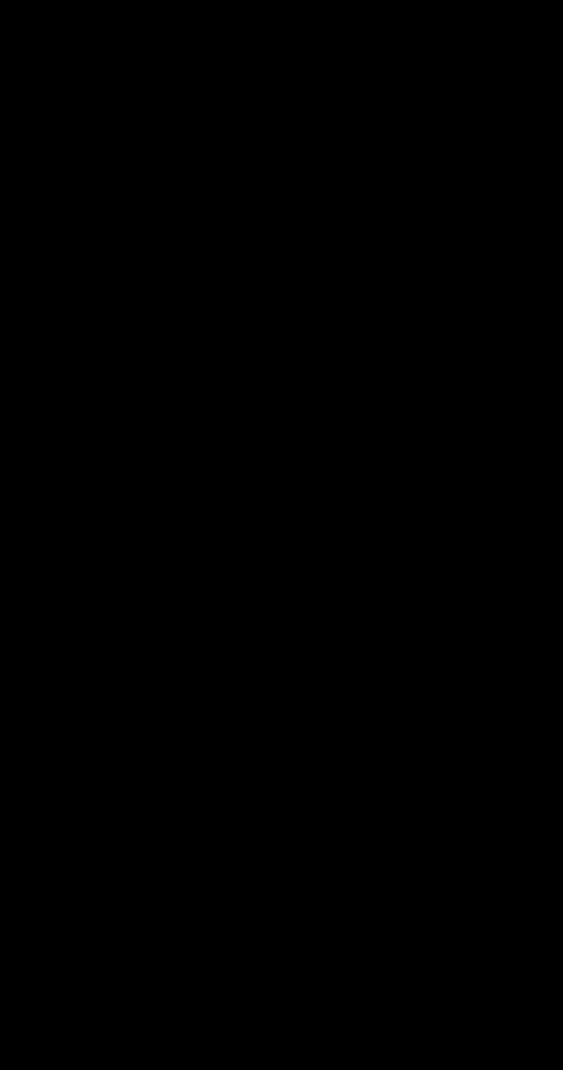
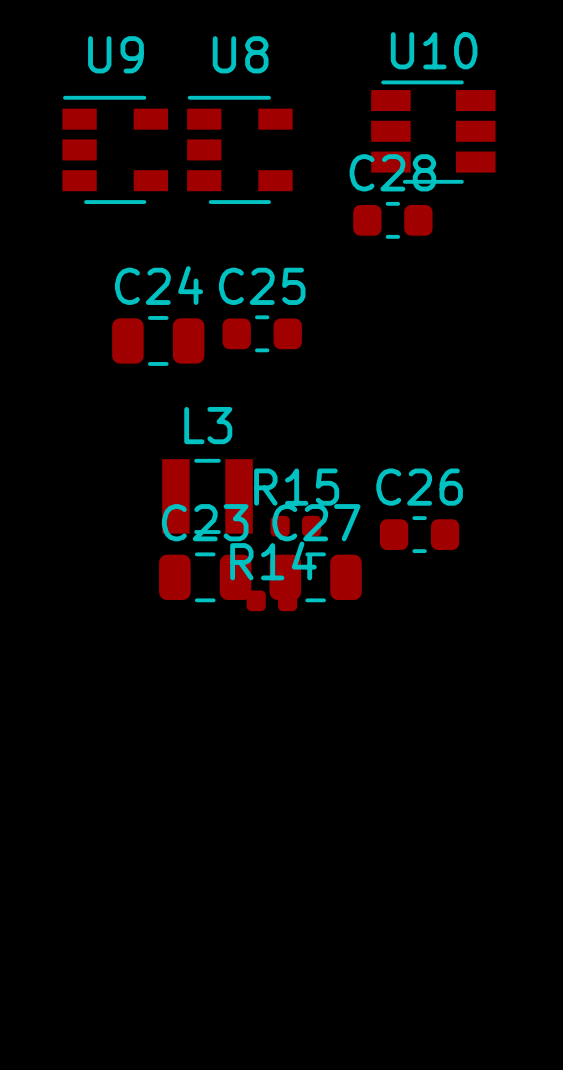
U10: none -> (433, 132)
U9: none -> (115, 149)
U8: none -> (239, 149)
C28: none -> (392, 220)
C25: none -> (262, 333)
C24: none -> (158, 340)
L3: none -> (207, 496)
R15: none -> (295, 526)
C26: none -> (419, 534)
C23: none -> (205, 577)
C27: none -> (315, 577)
R14: none -> (271, 600)

